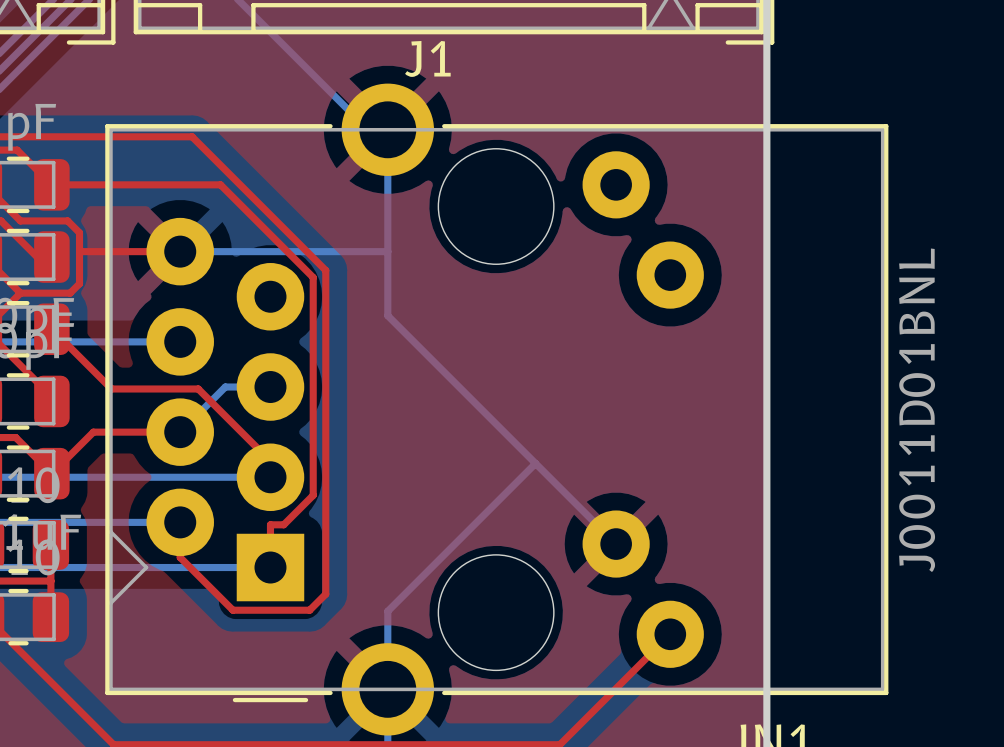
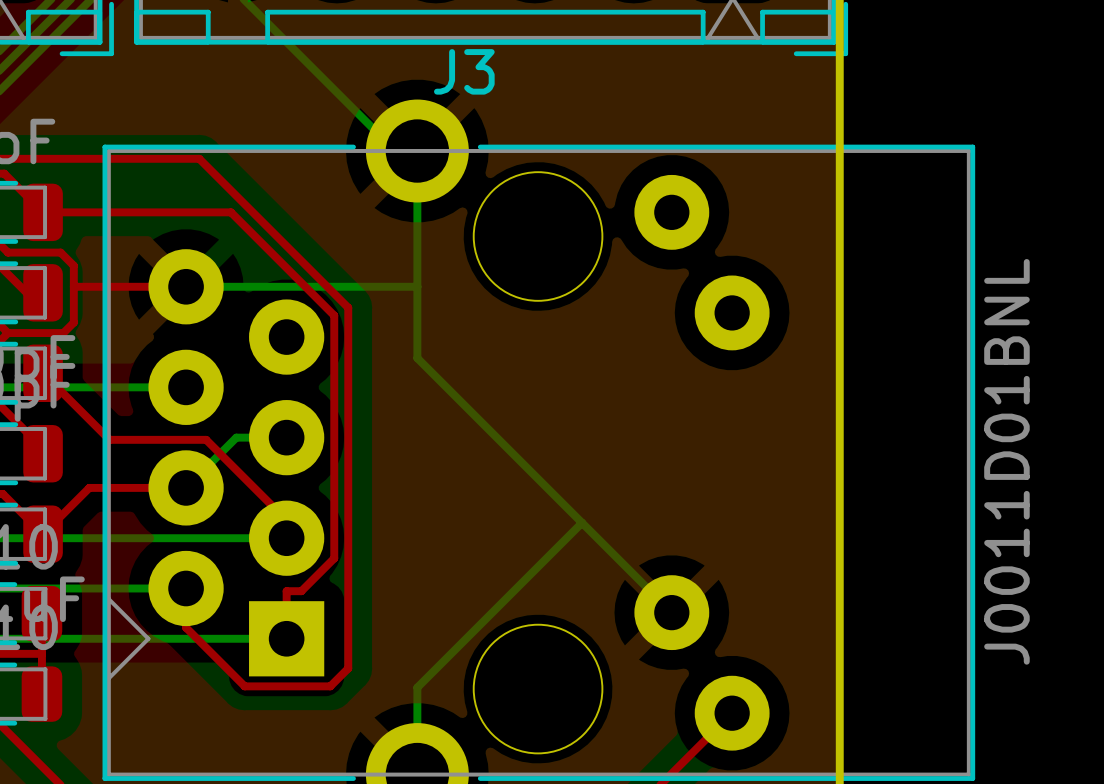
J1 name: J1 (427, 58) -> J3 (464, 71)

